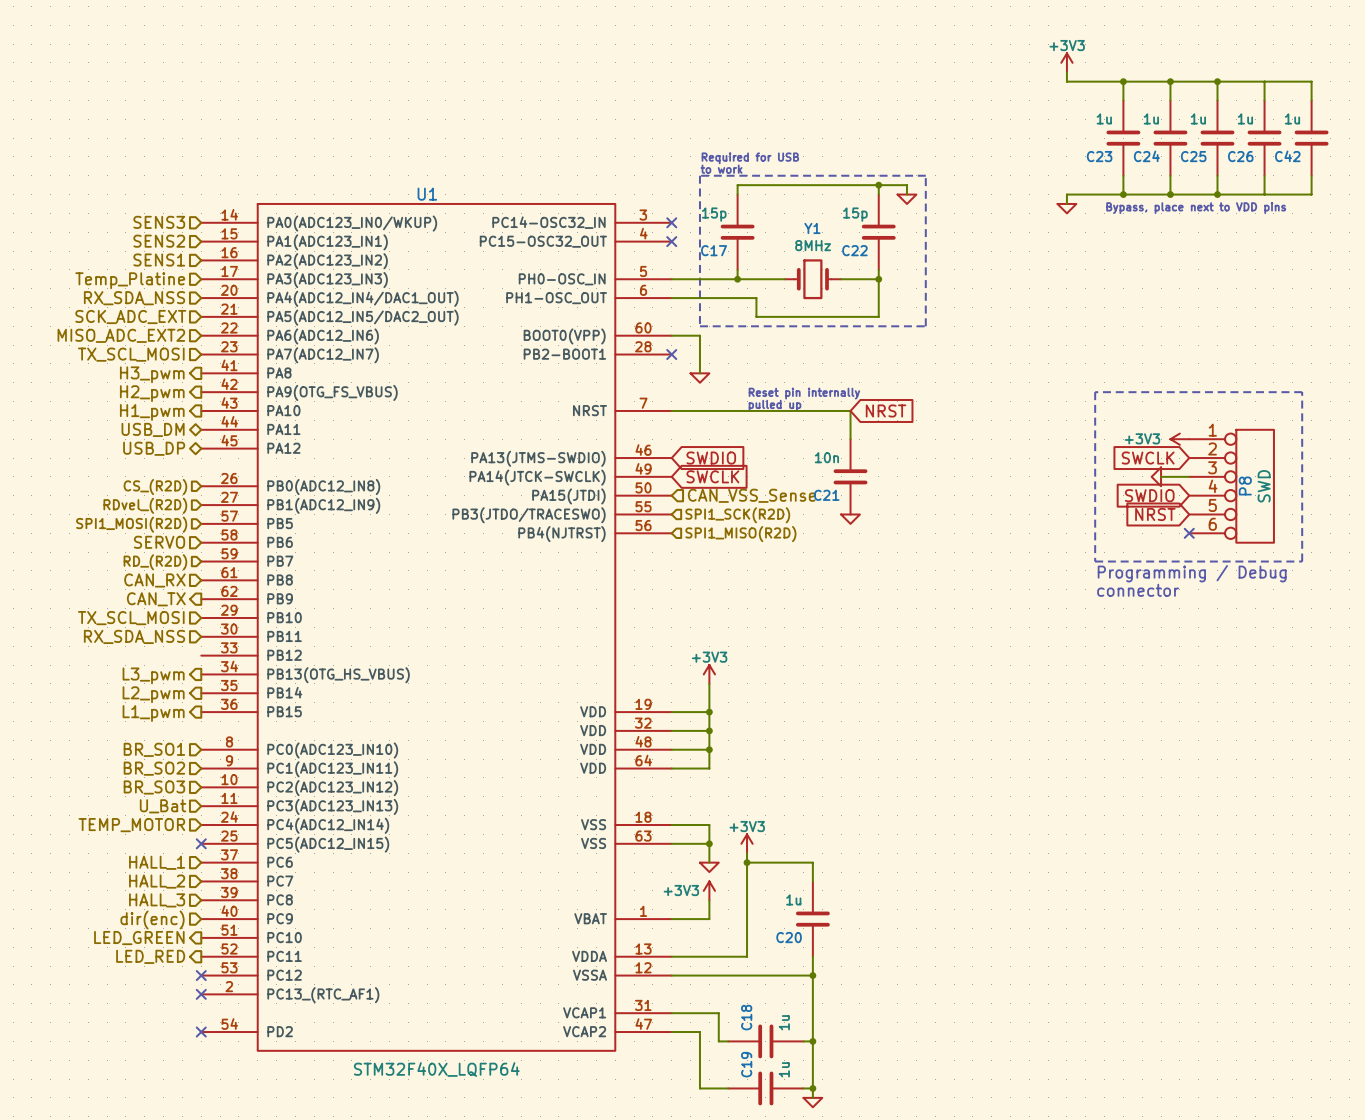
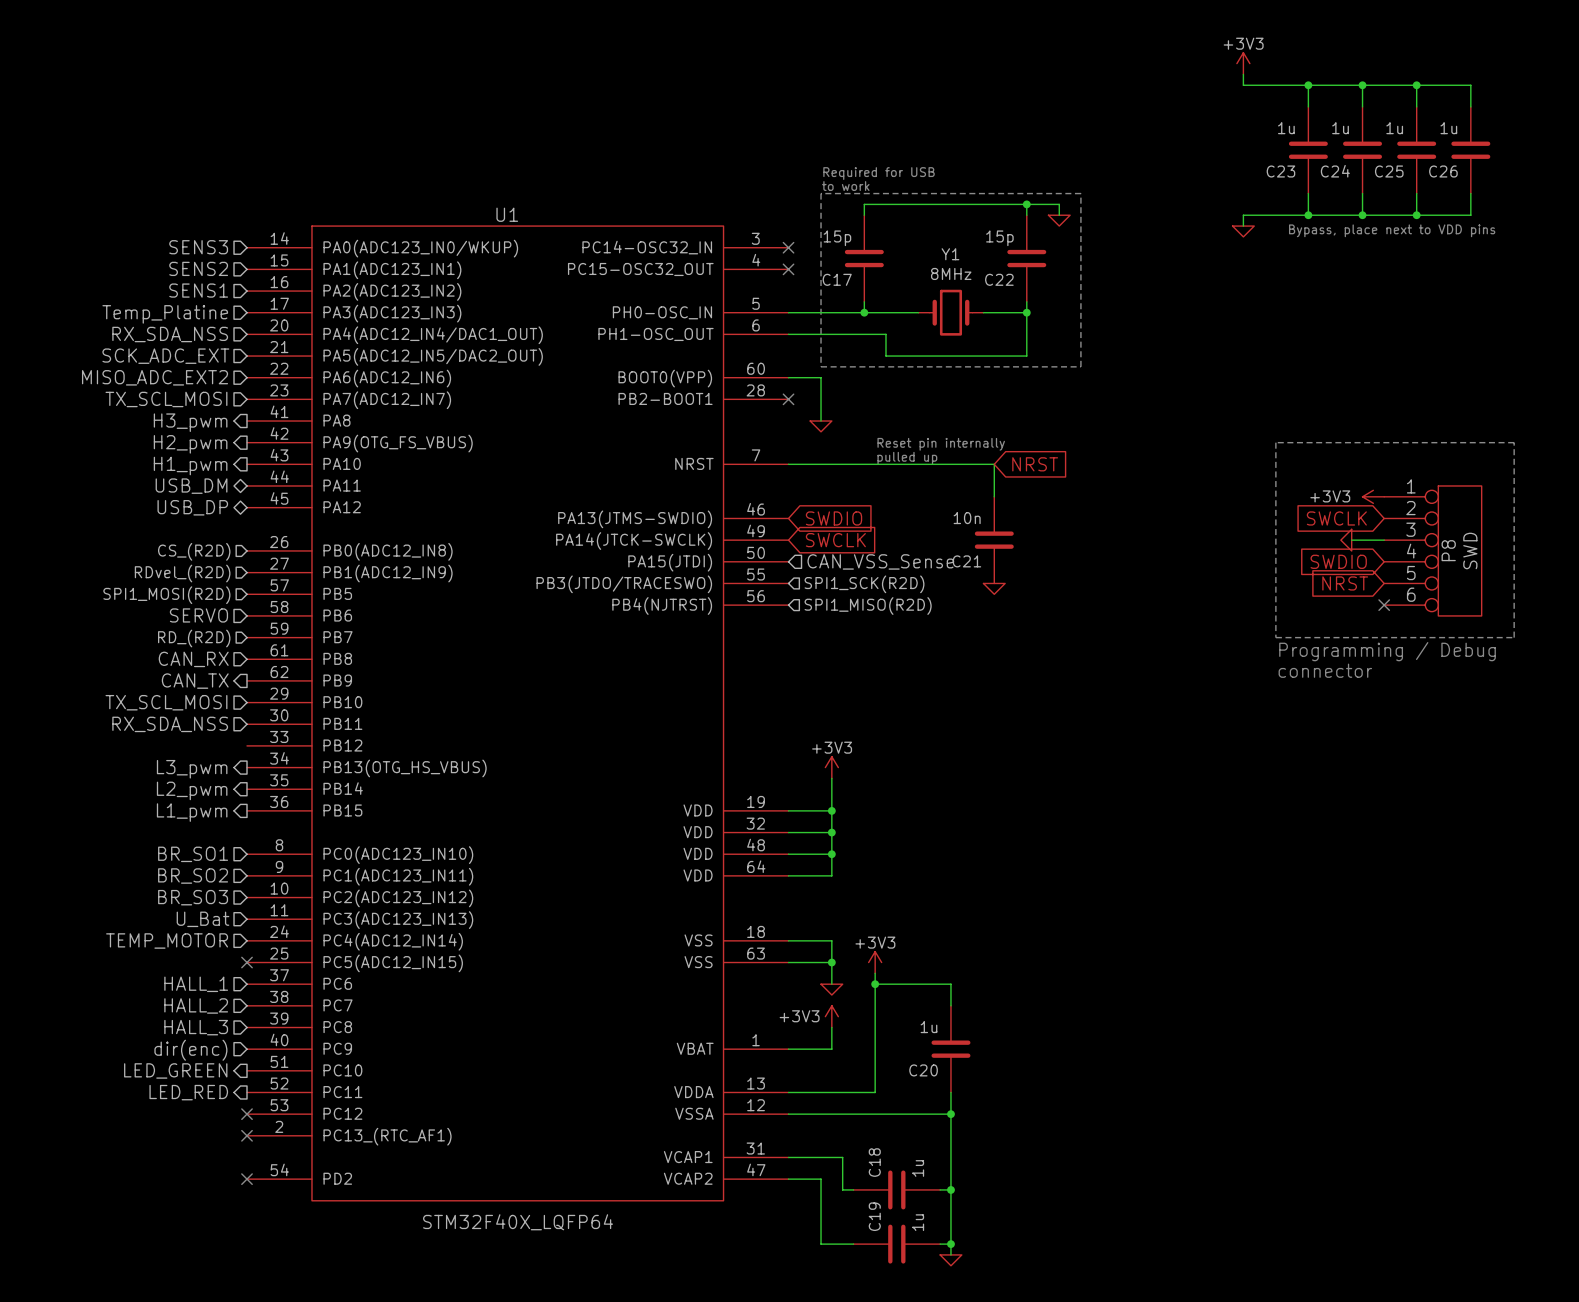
wire: (1264, 81) (1311, 81) (1311, 100) -> none
C42: 1u (1311, 138) -> none
wire: (1311, 175) (1311, 194) (1264, 194) -> none

